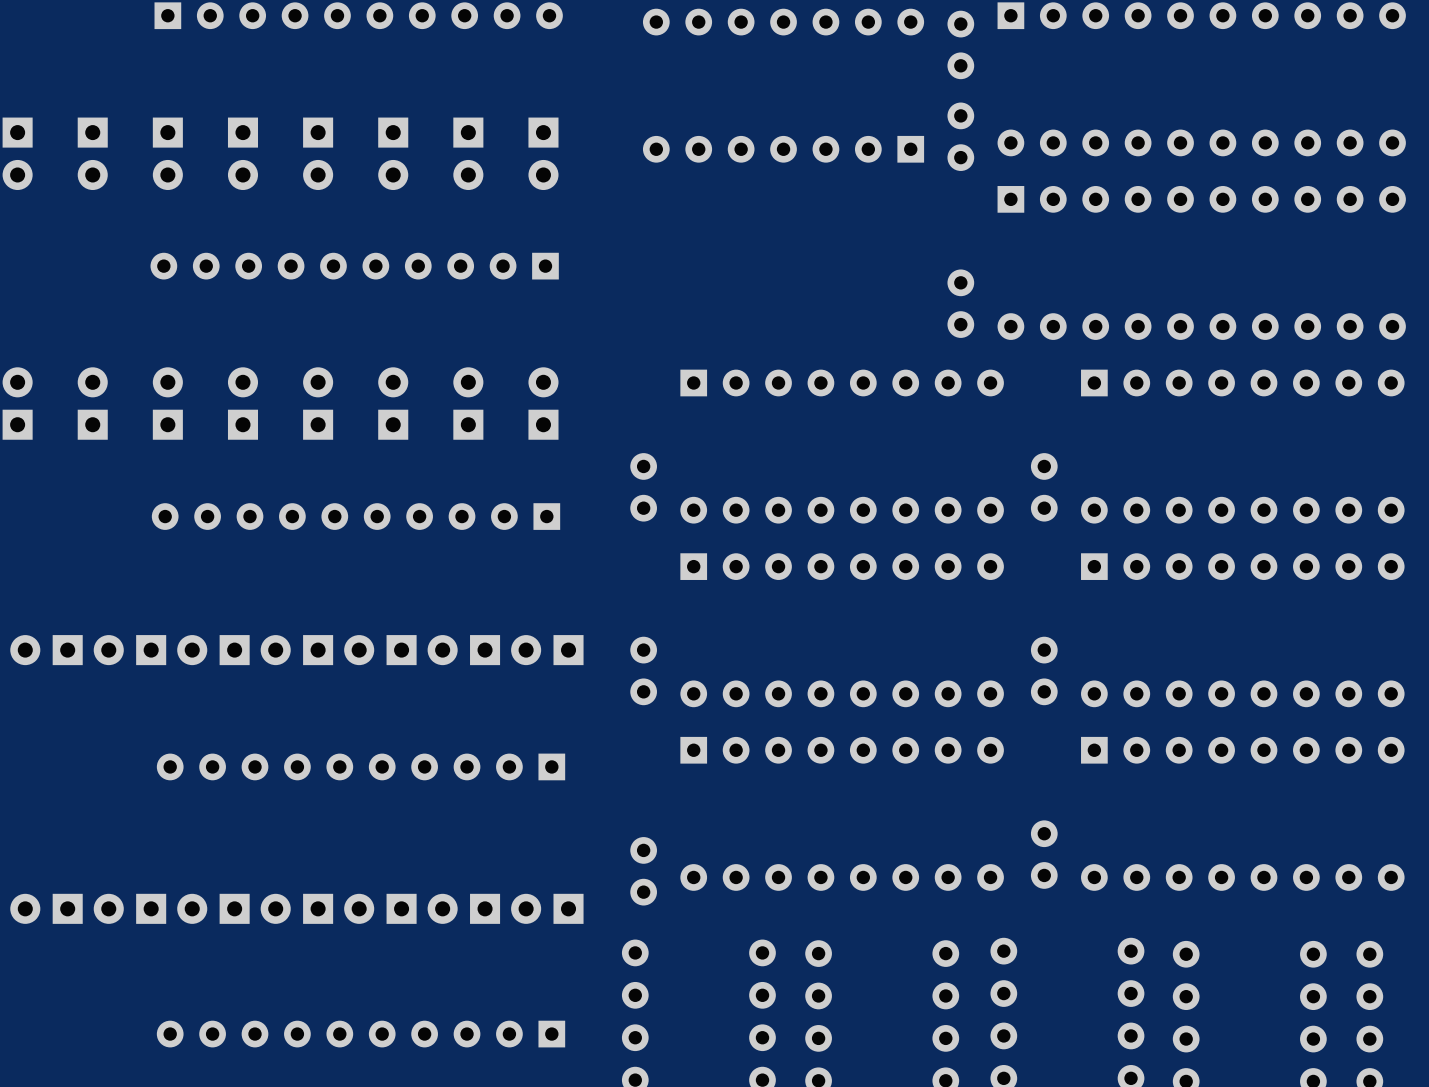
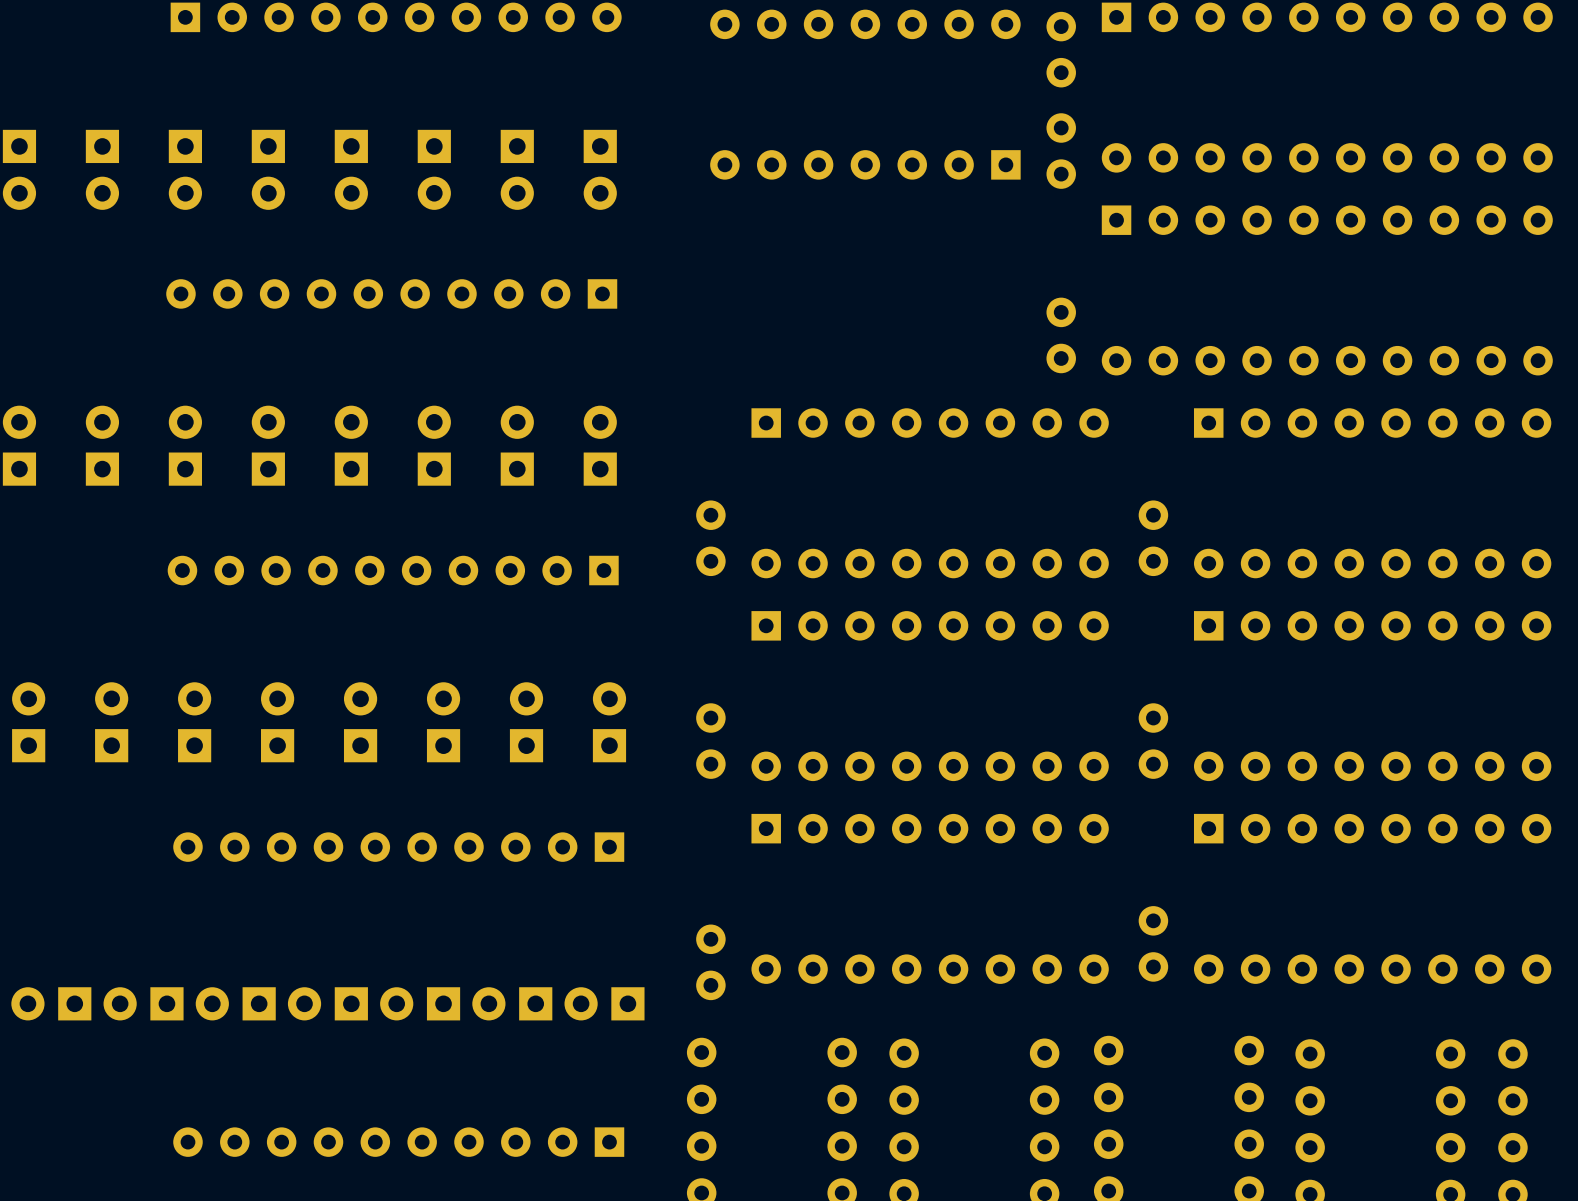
part rotation: 0° (46, 650) -> 90° clockwise (28, 722)
part: (129, 650) -> none
part: (213, 650) -> none
part: (296, 650) -> none
part rotation: 0° (380, 650) -> 90° clockwise (443, 722)
part rotation: 0° (463, 650) -> 90° clockwise (526, 722)
part rotation: 0° (547, 650) -> 90° clockwise (609, 722)
part: none -> (111, 722)
part: none -> (194, 722)
part: none -> (277, 722)
part: none -> (360, 722)

